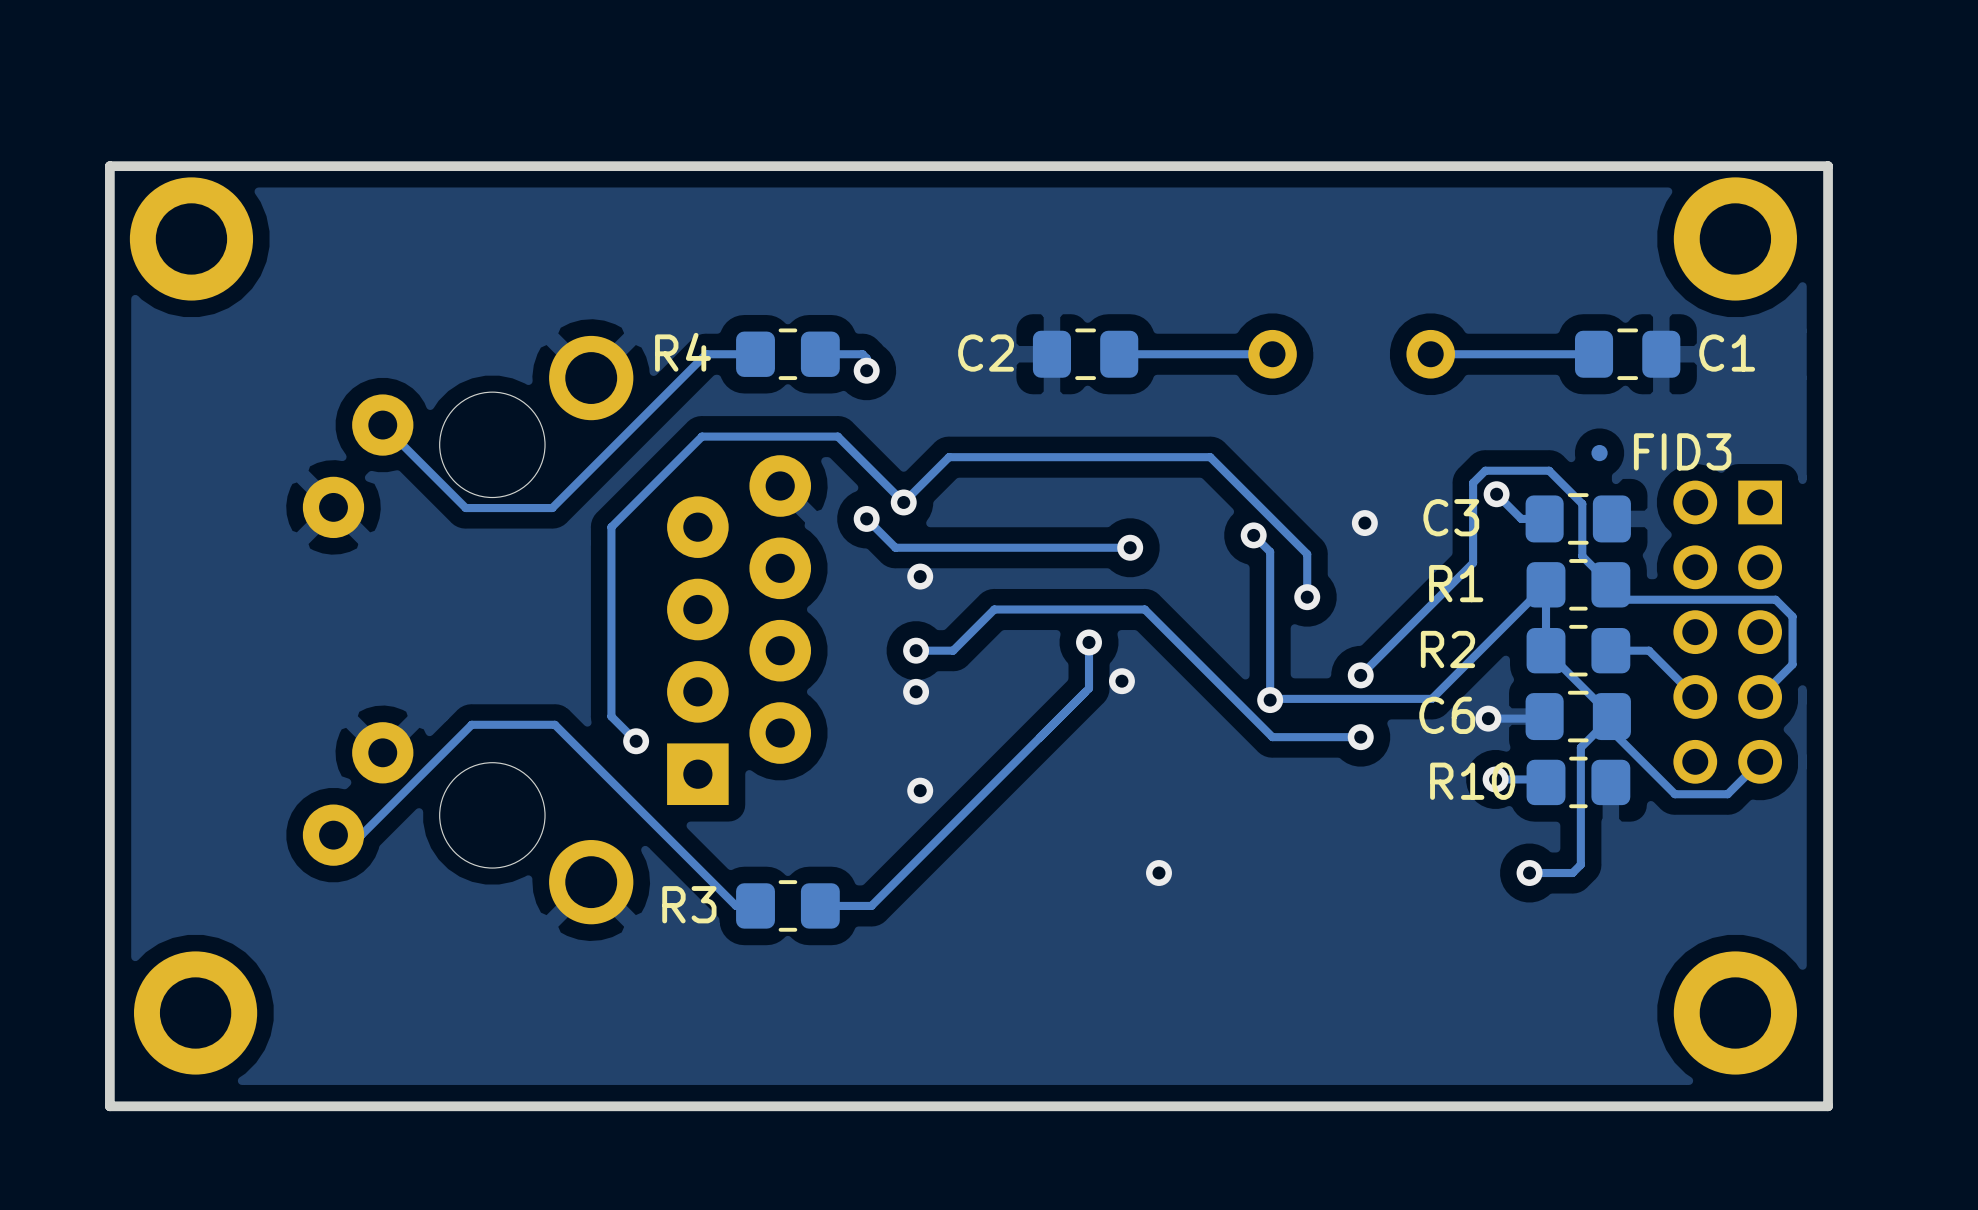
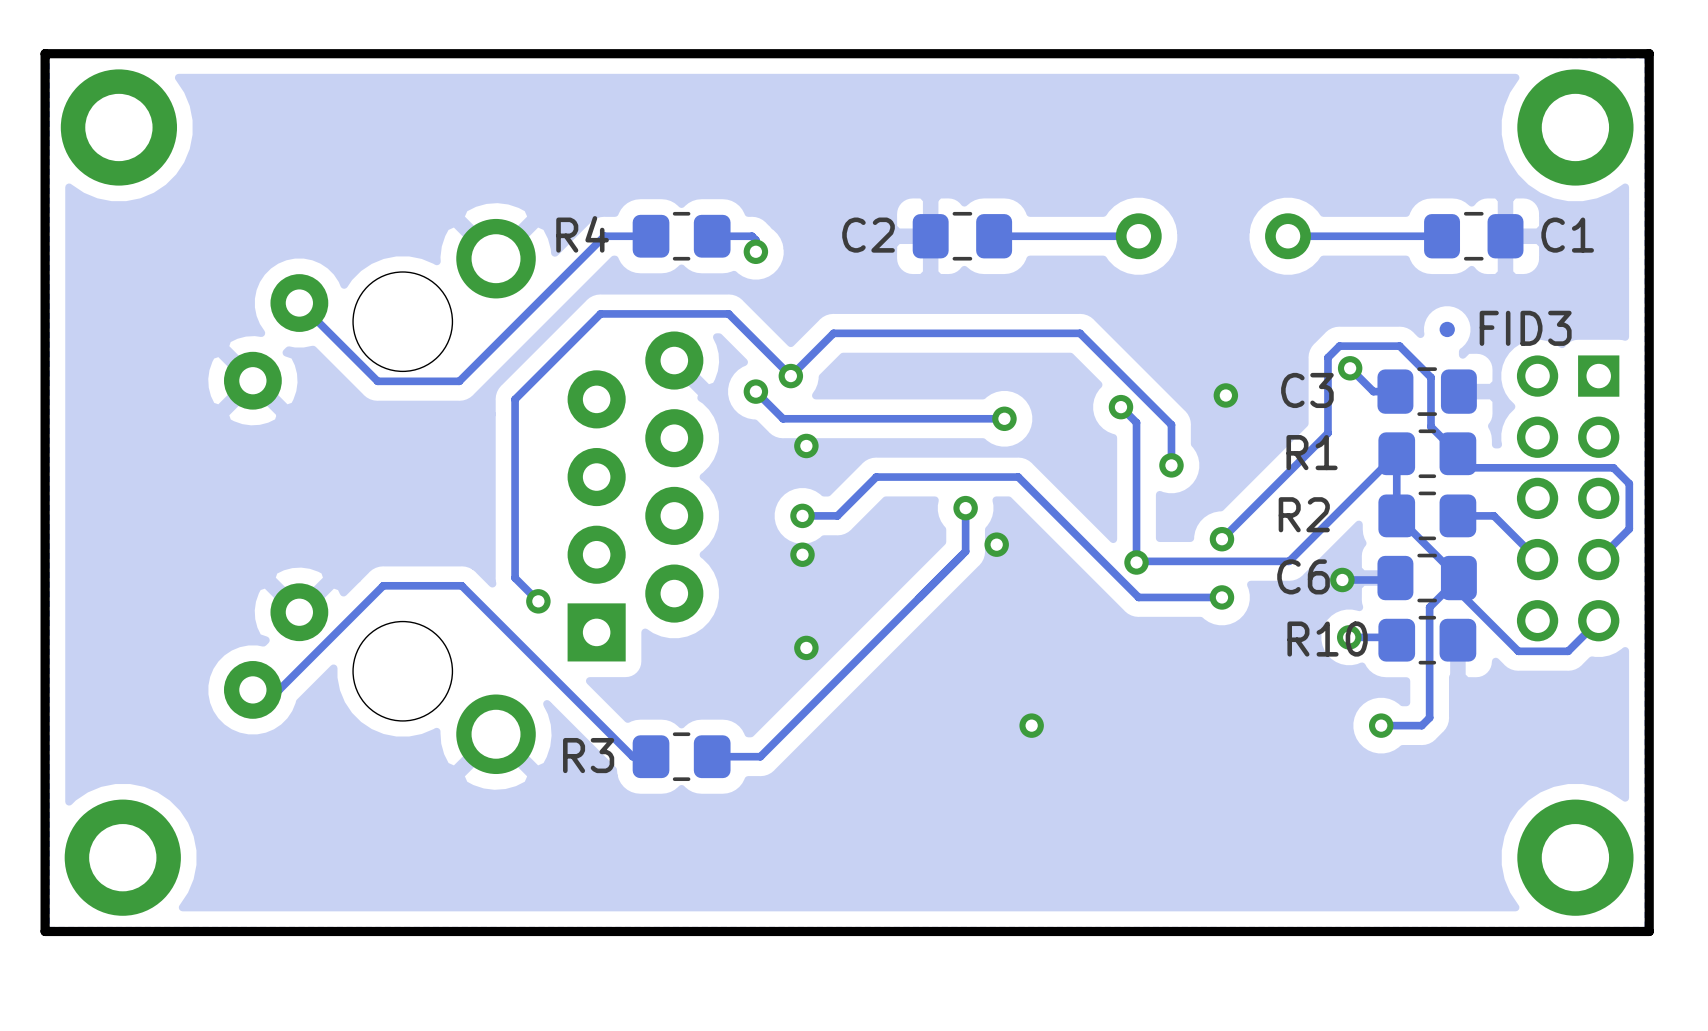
board edge: (1828, 166) (109, 166) (109, 1106) (1828, 1106) (1828, 166) -> (1649, 53) (1649, 931) (45, 931) (45, 53) (1649, 53)

